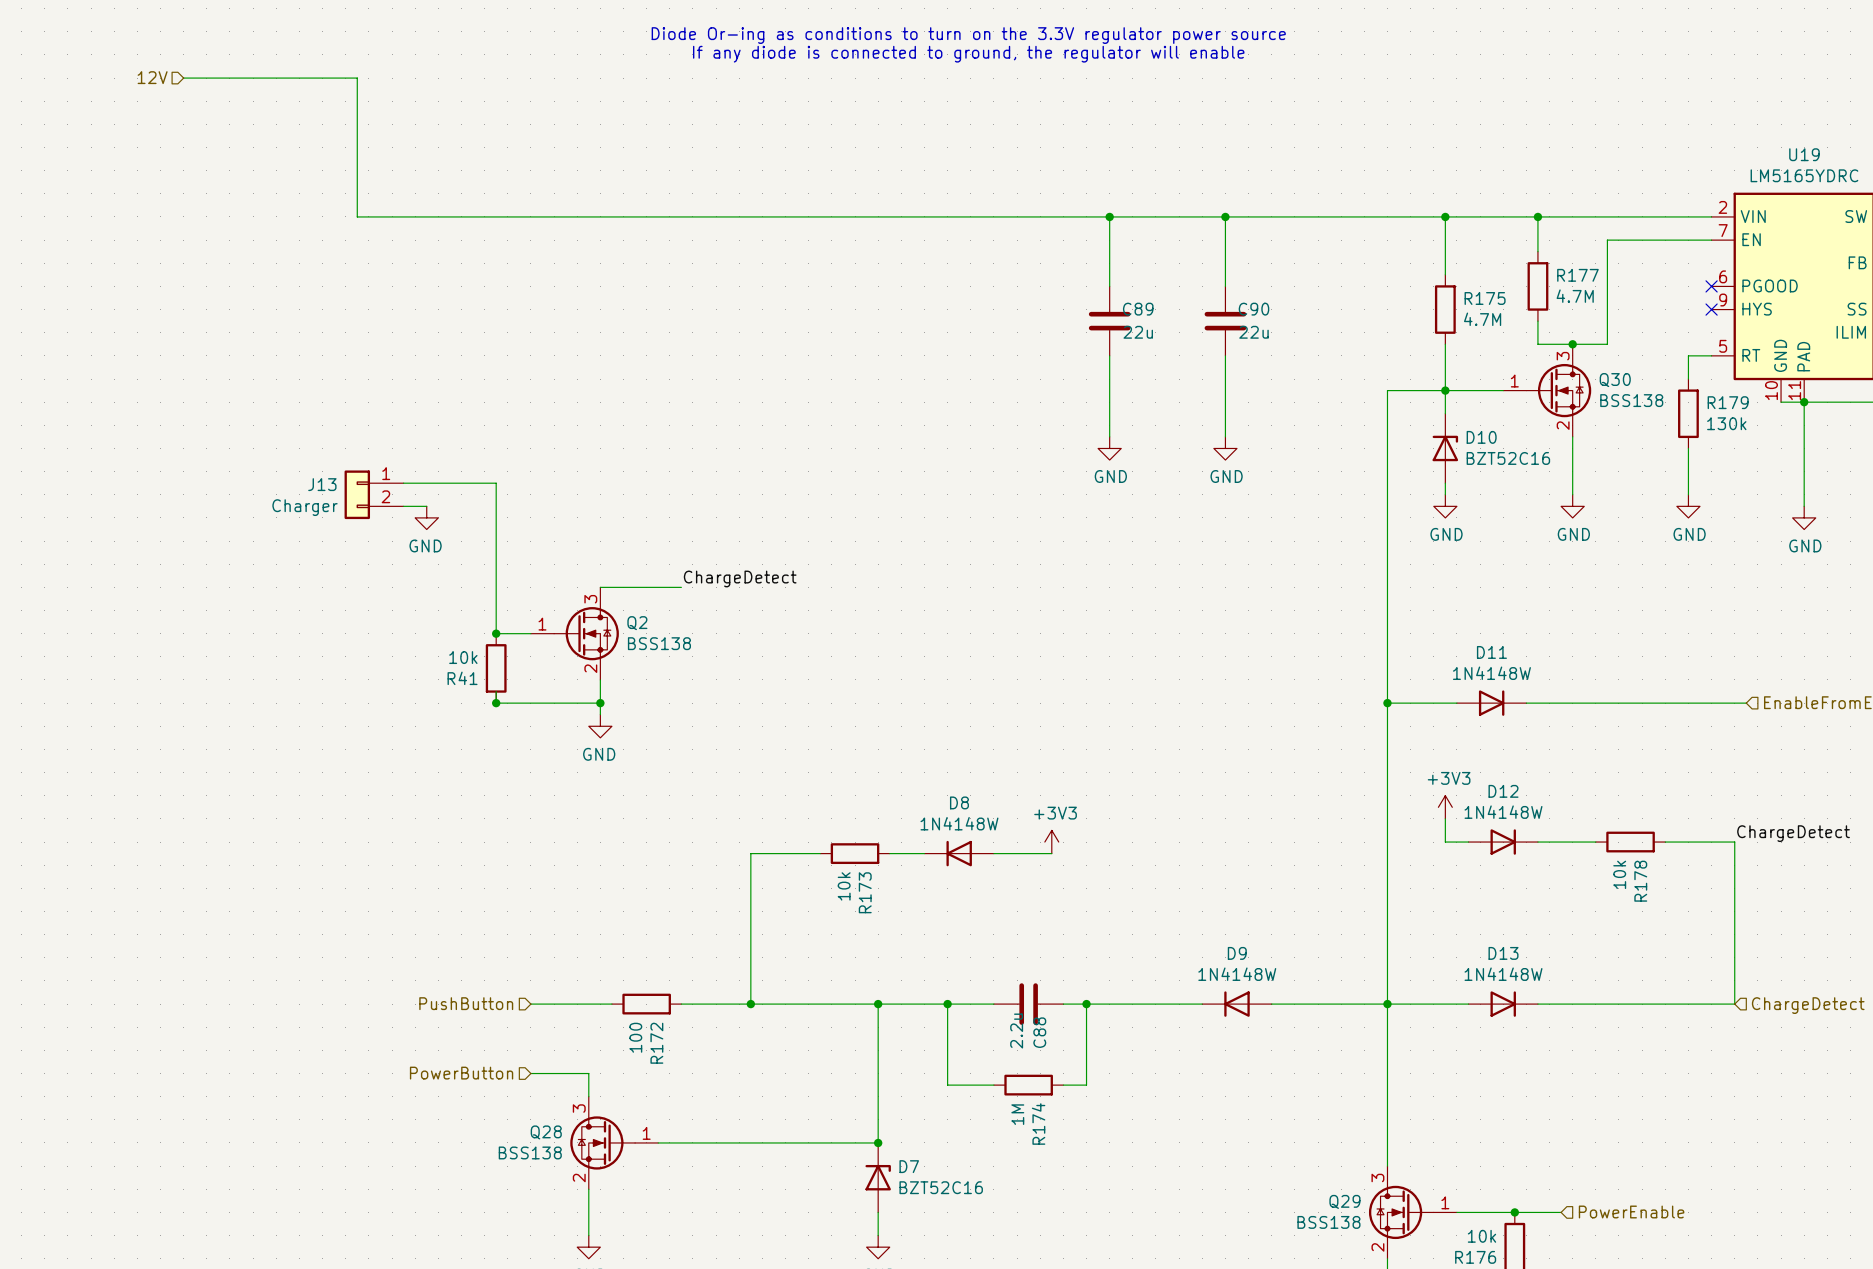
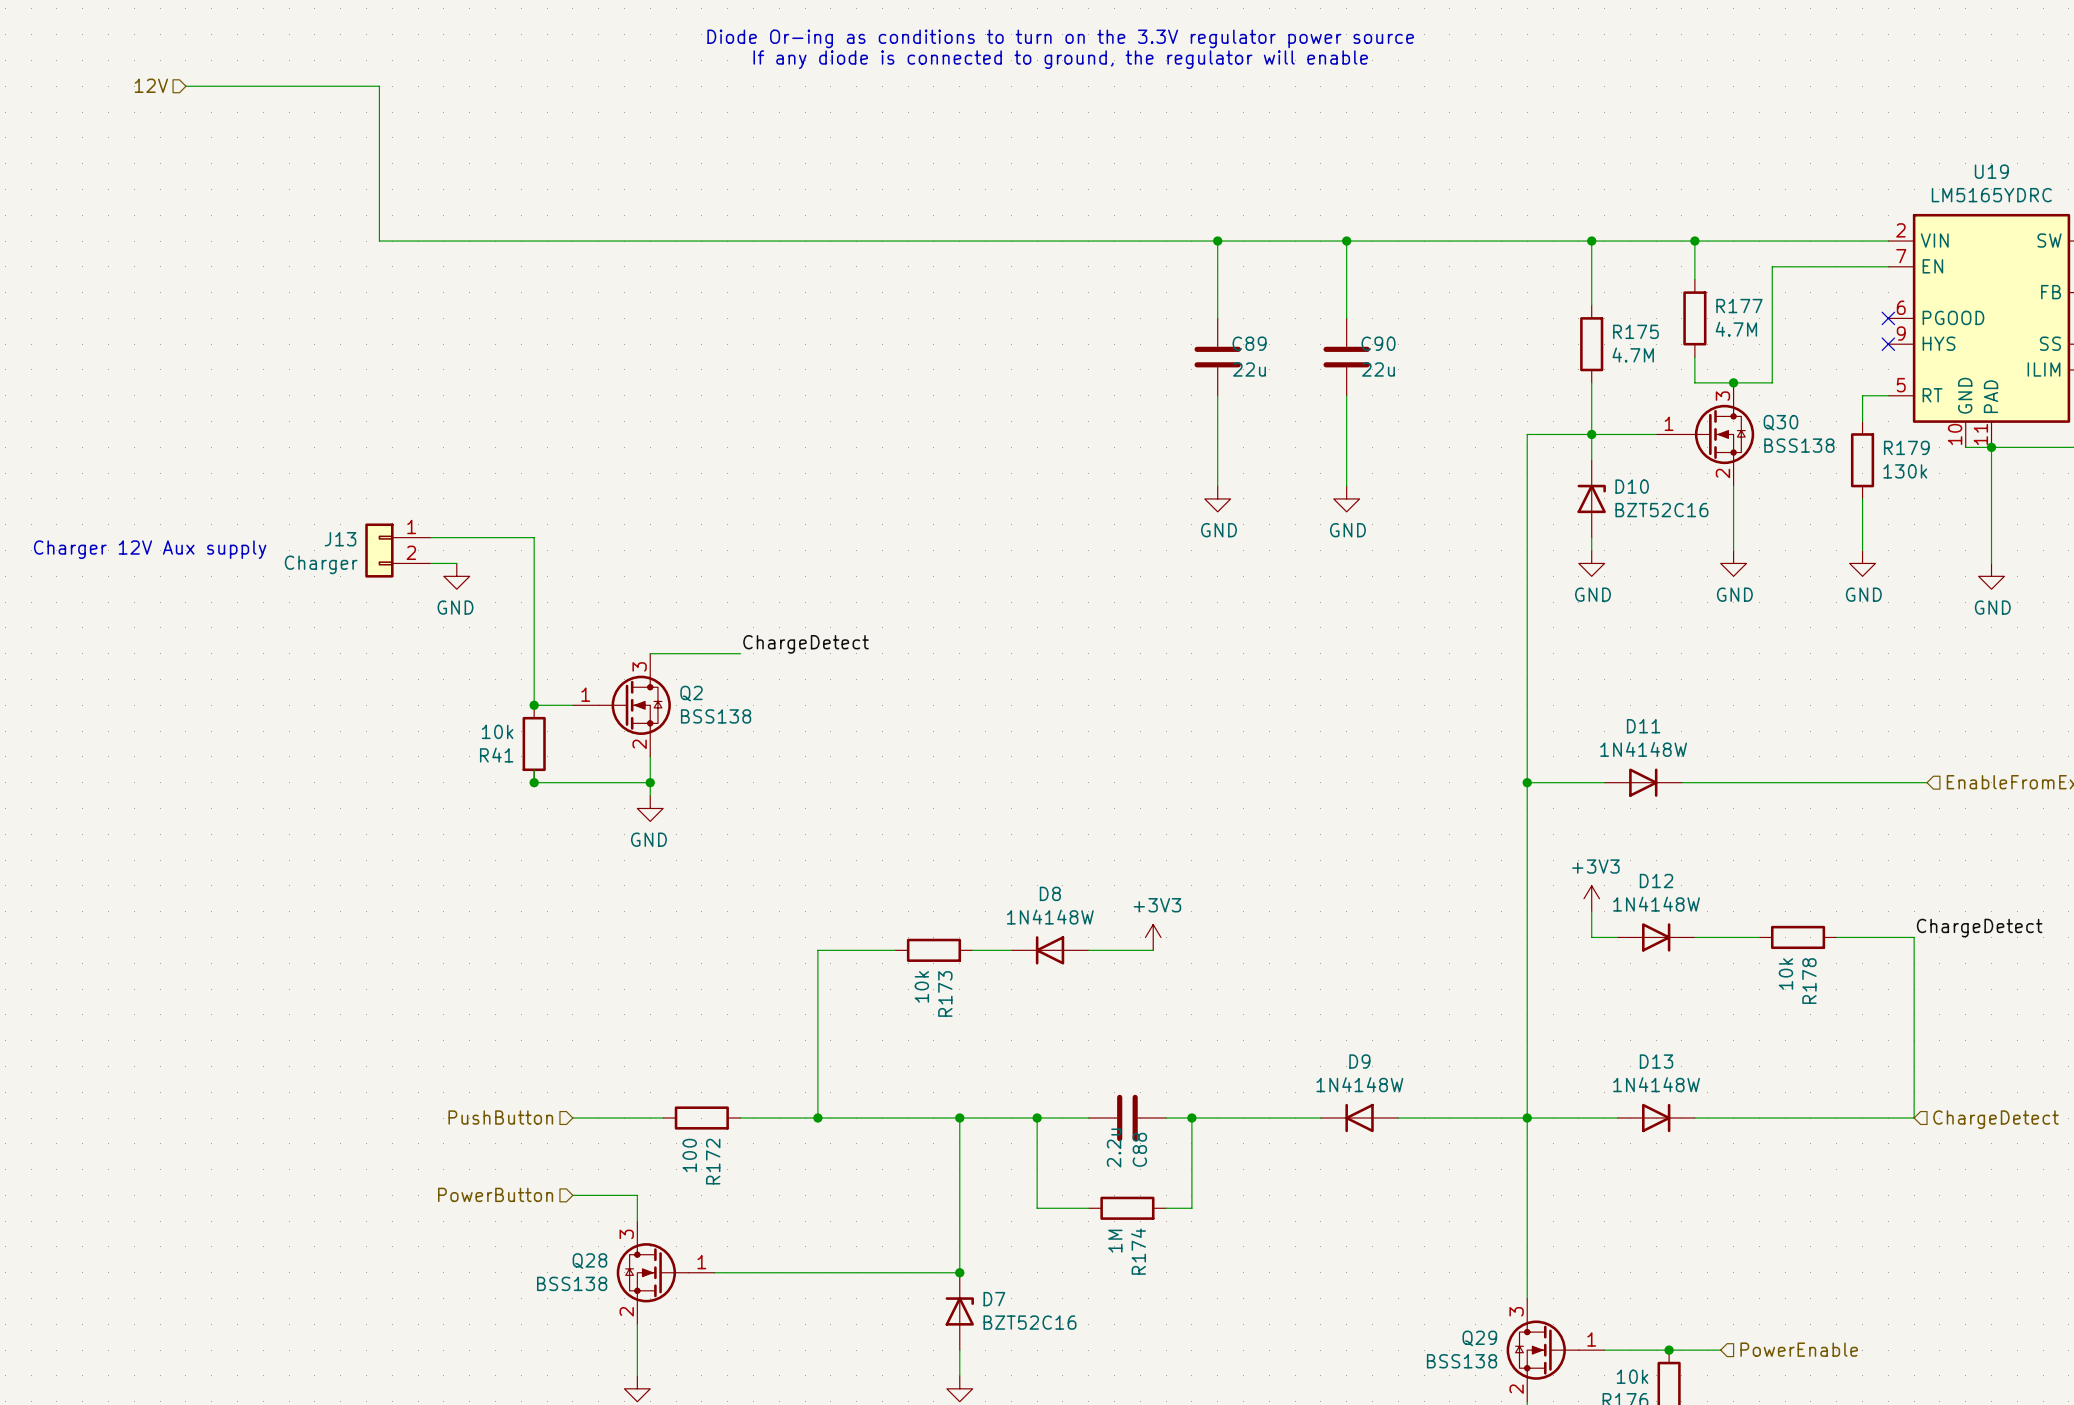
text: none -> Charger 12V Aux supply (150, 549)

